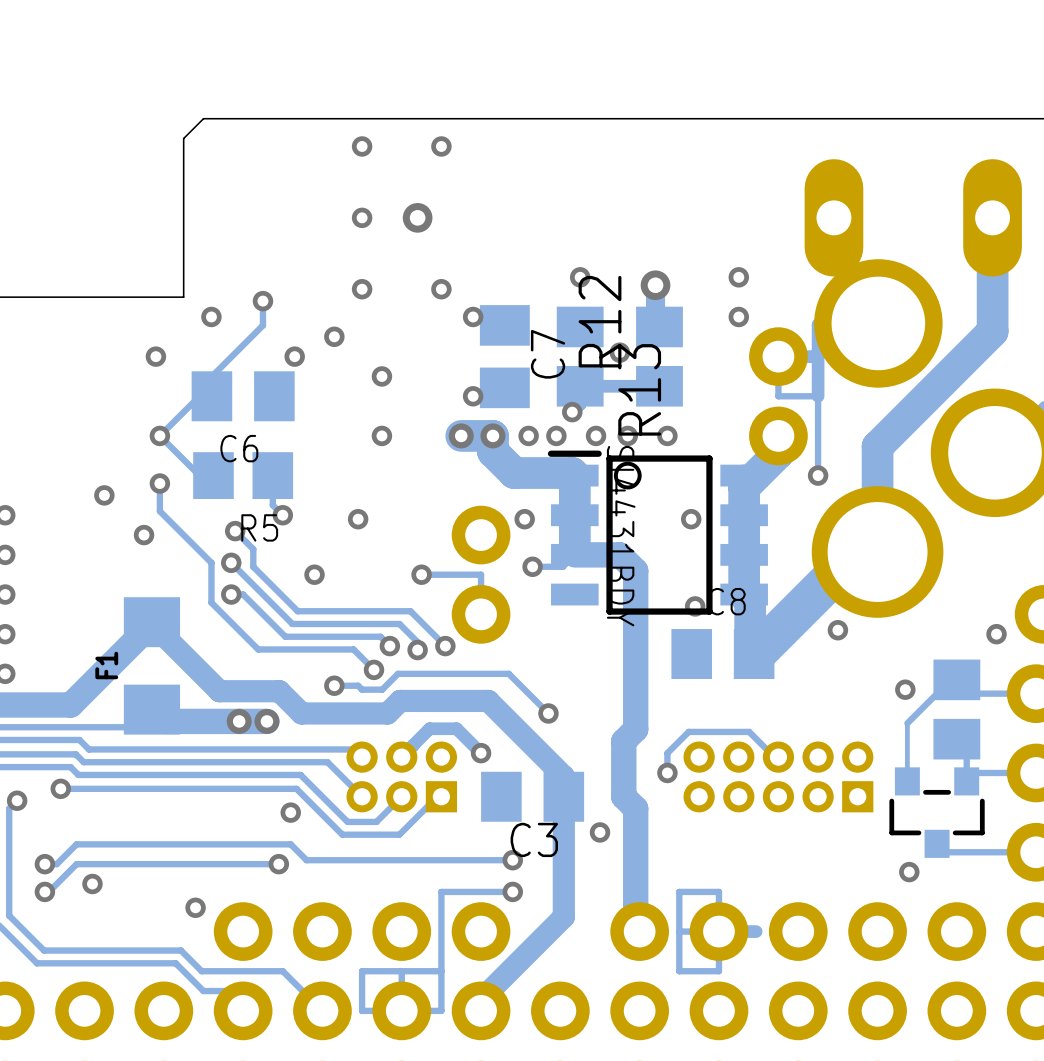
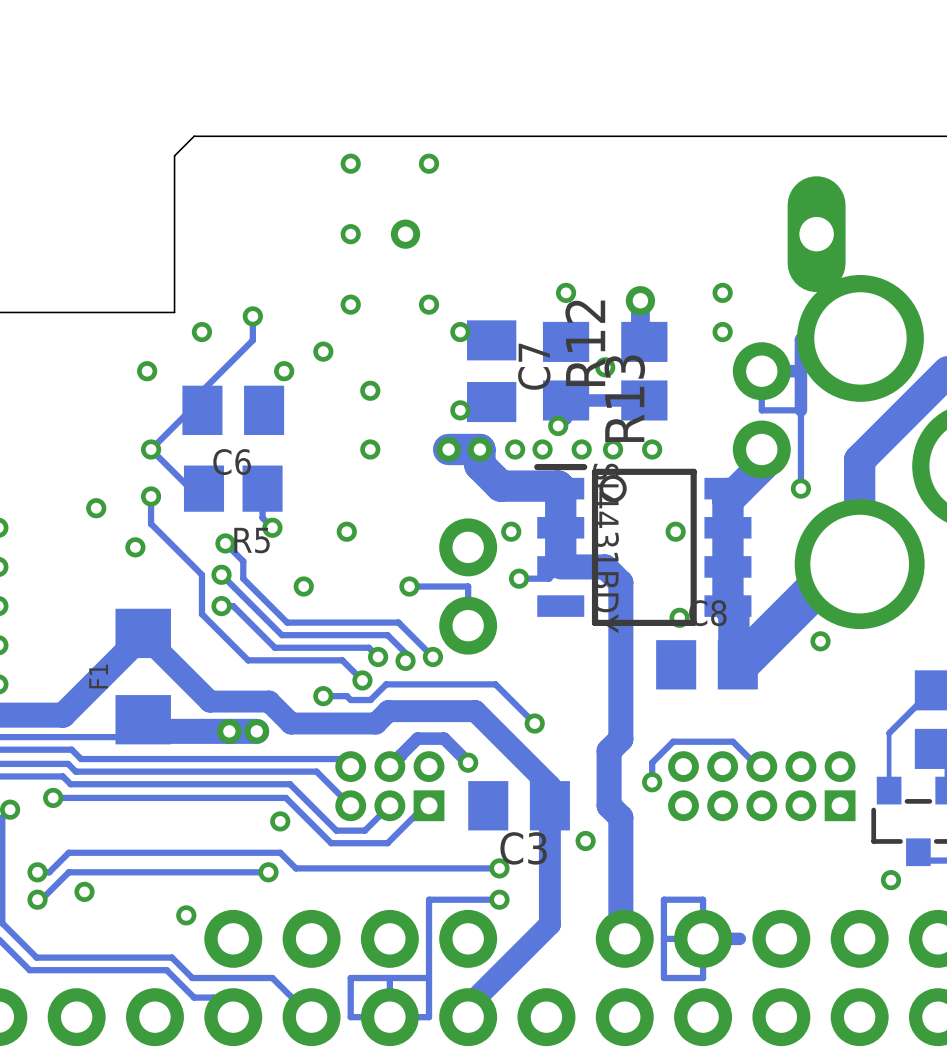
via: (905, 689) -> none

